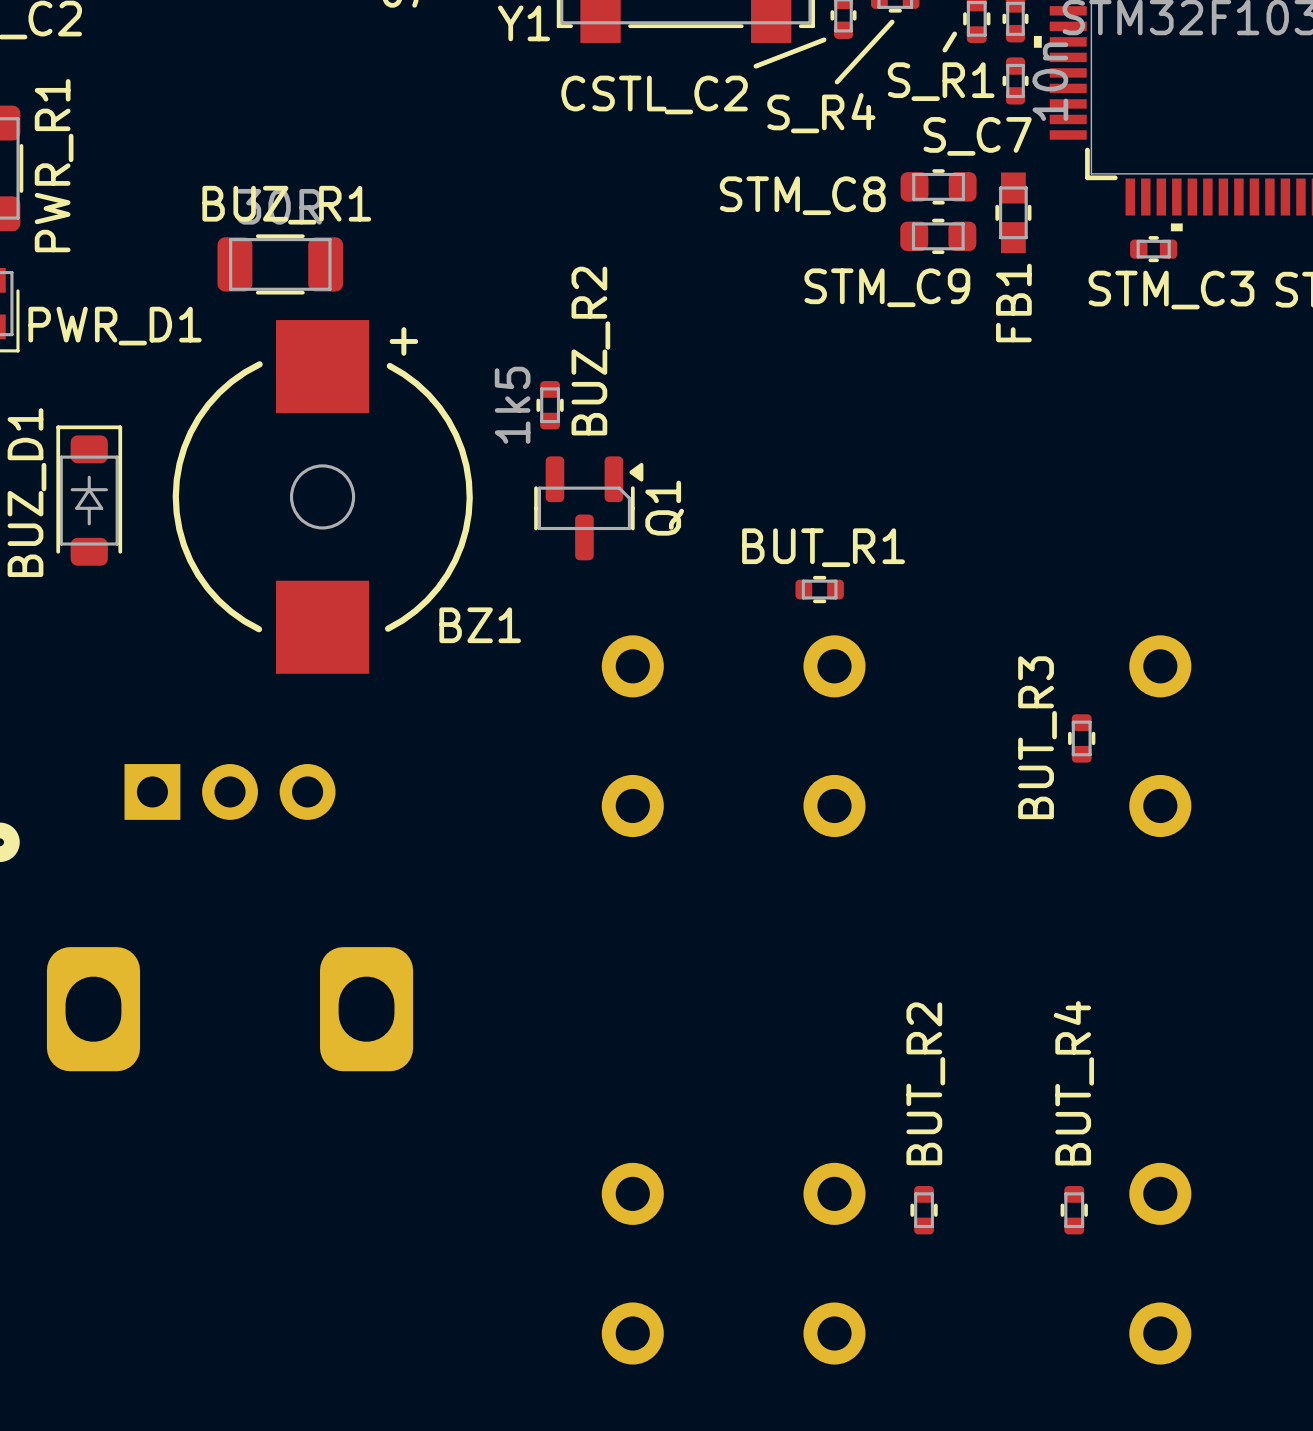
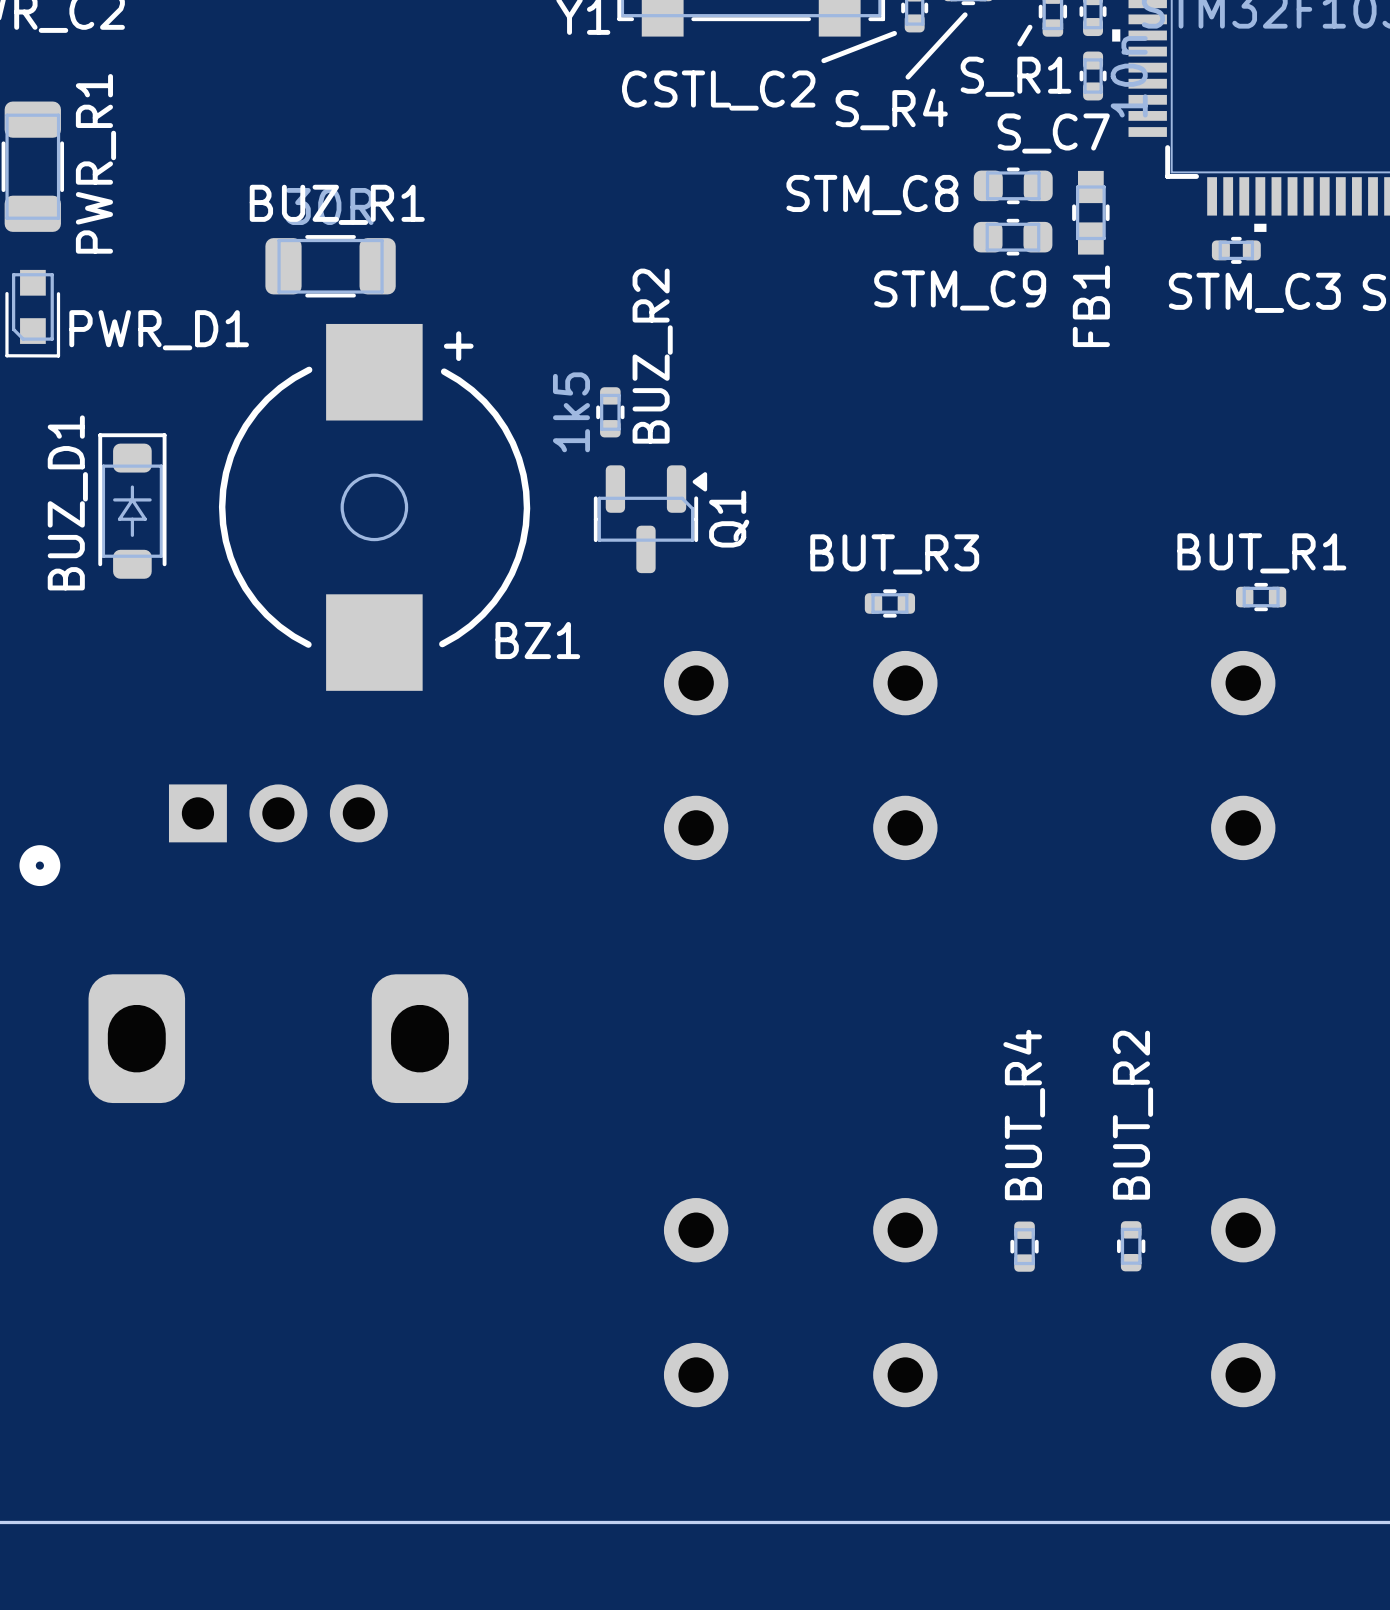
BUT_R1 name: BUT_R1 (823, 547) -> BUT_R3 (894, 554)
BUT_R1: none -> (1261, 597)
BUT_R3: (1081, 738) -> none
BUT_R2 position: (924, 1210) -> (1131, 1246)
BUT_R4 position: (1074, 1210) -> (1024, 1246)

